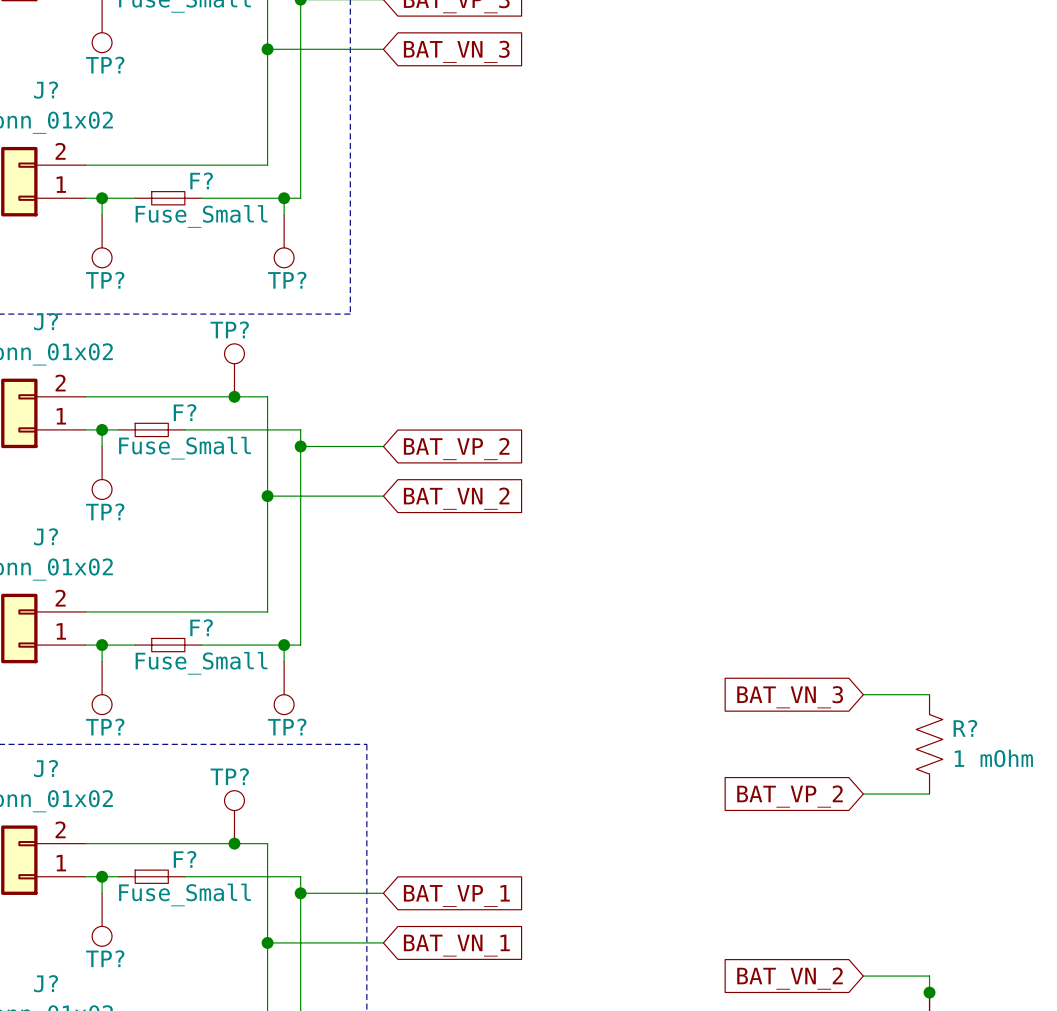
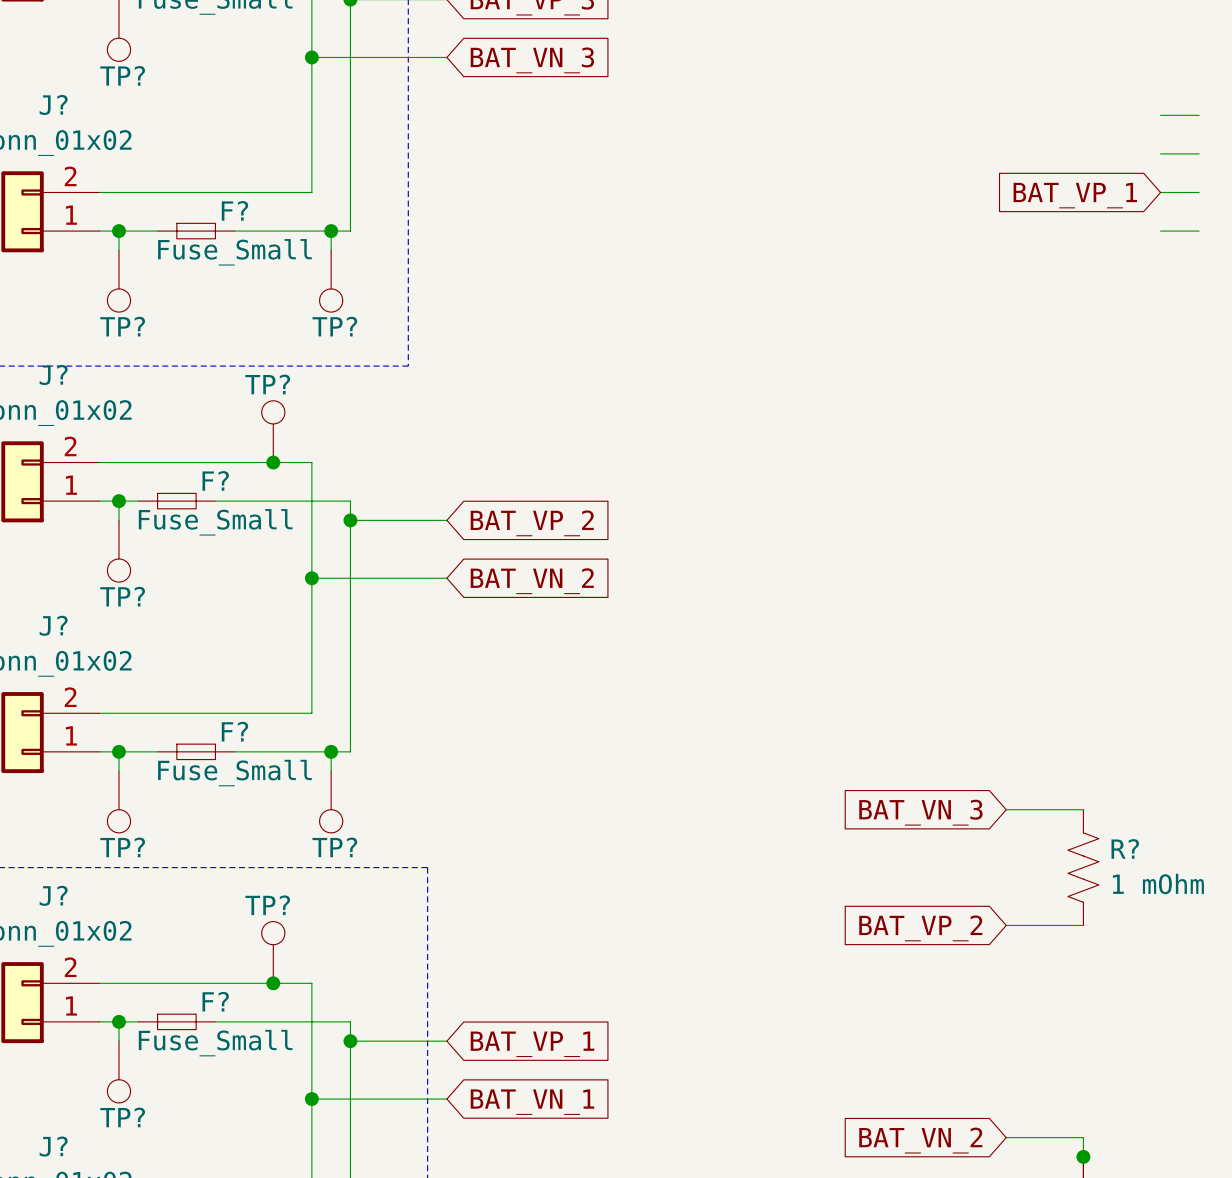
wire: none -> (1160, 115) (1199, 115)
wire: none -> (1160, 153) (1199, 153)
wire: none -> (1160, 192) (1199, 192)
global label: none -> BAT_VP_1 (1075, 195)
wire: none -> (1160, 231) (1199, 231)

